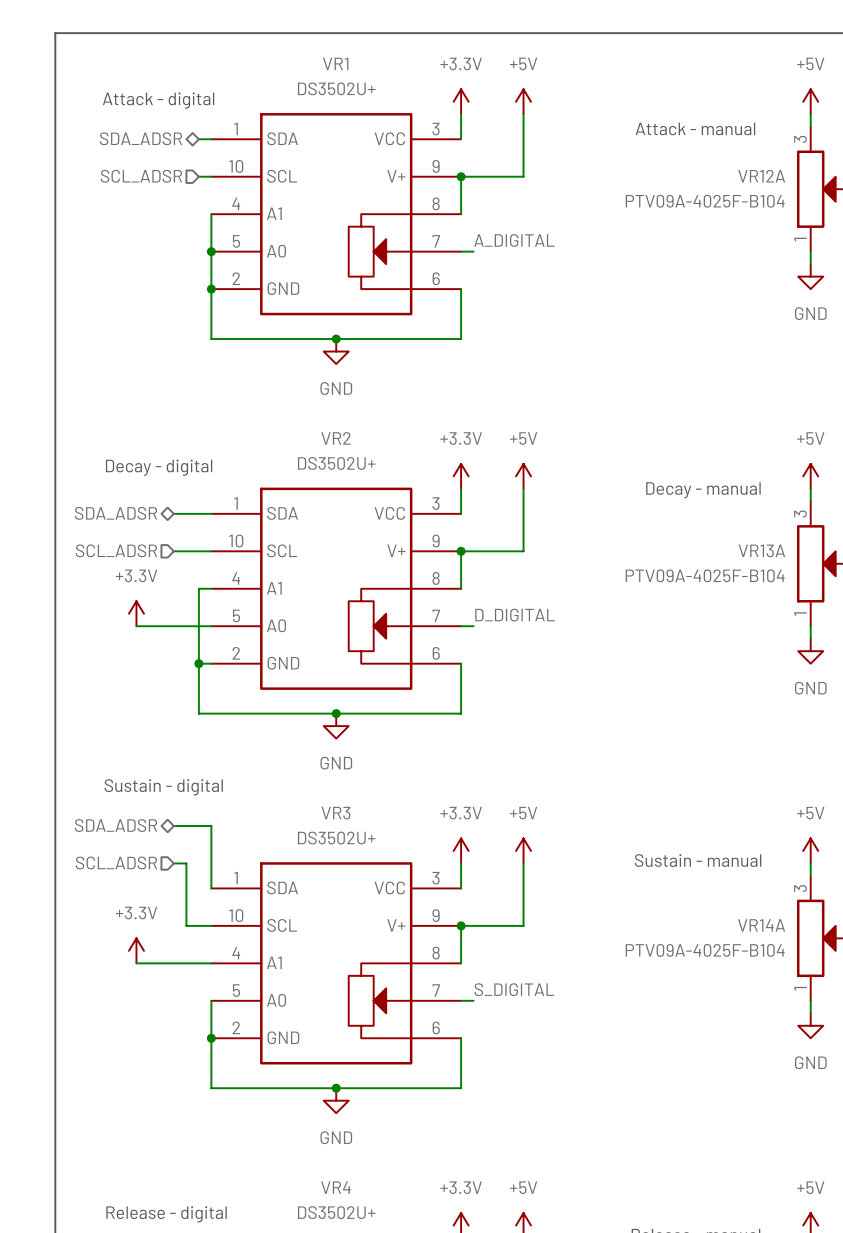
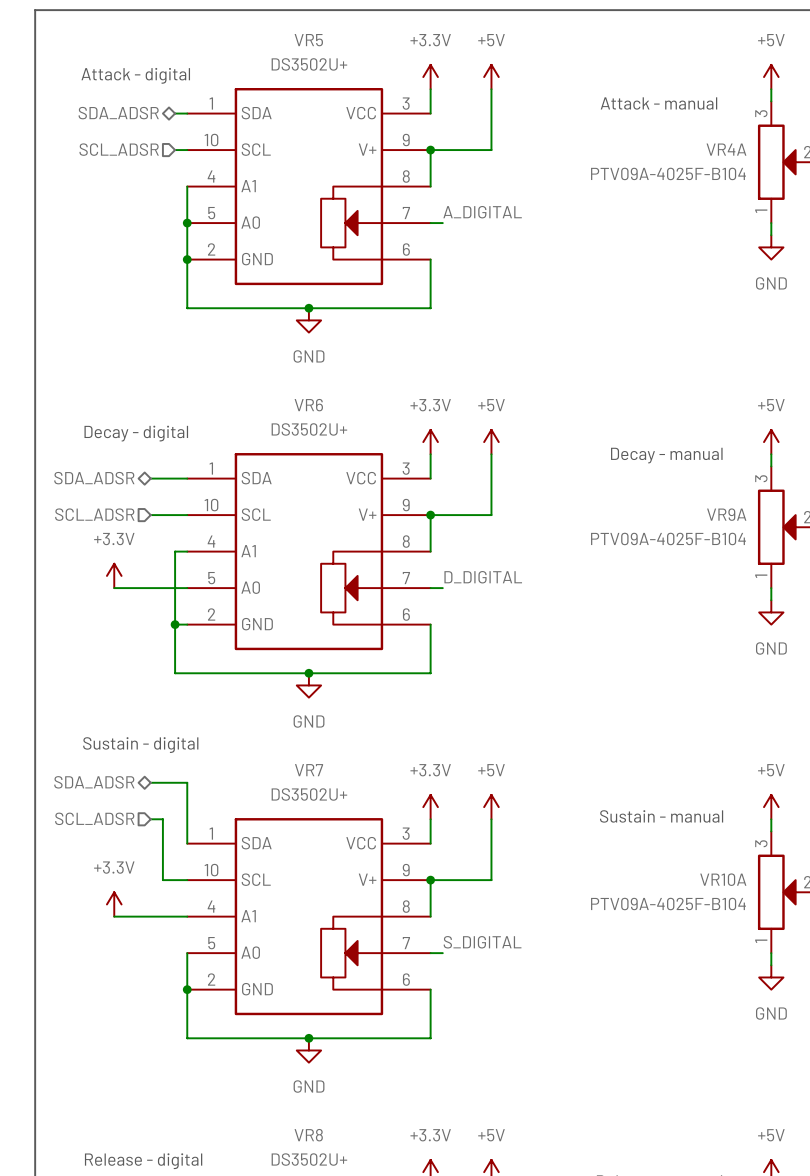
VR1 name: VR1 (335, 63) -> VR5 (308, 40)
VR12A name: VR12A (761, 176) -> VR4A (726, 149)
VR2 name: VR2 (336, 438) -> VR6 (308, 405)
VR13A name: VR13A (761, 550) -> VR9A (726, 514)
VR3 name: VR3 (335, 813) -> VR7 (309, 770)
VR14A name: VR14A (761, 925) -> VR10A (723, 879)
VR4 name: VR4 (336, 1187) -> VR8 (308, 1135)

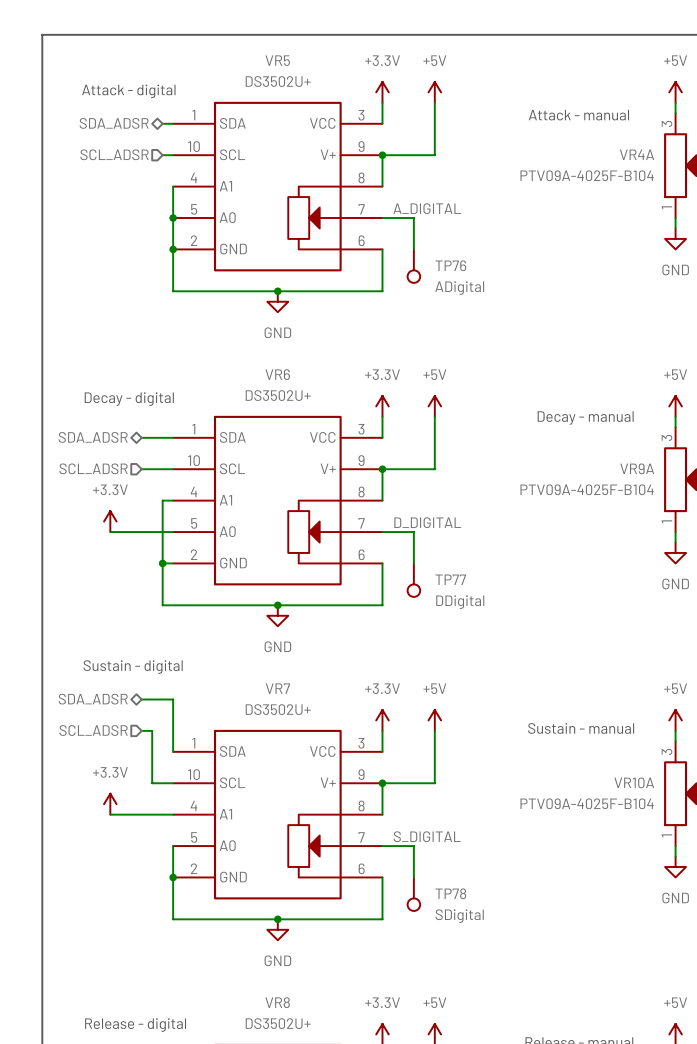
wire: none -> (392, 218) (413, 218) (413, 249)
TP76: none -> ADigital (413, 266)
wire: none -> (392, 532) (413, 532) (413, 563)
TP77: none -> DDigital (413, 580)
wire: none -> (392, 846) (413, 846) (413, 877)
TP78: none -> SDigital (413, 894)

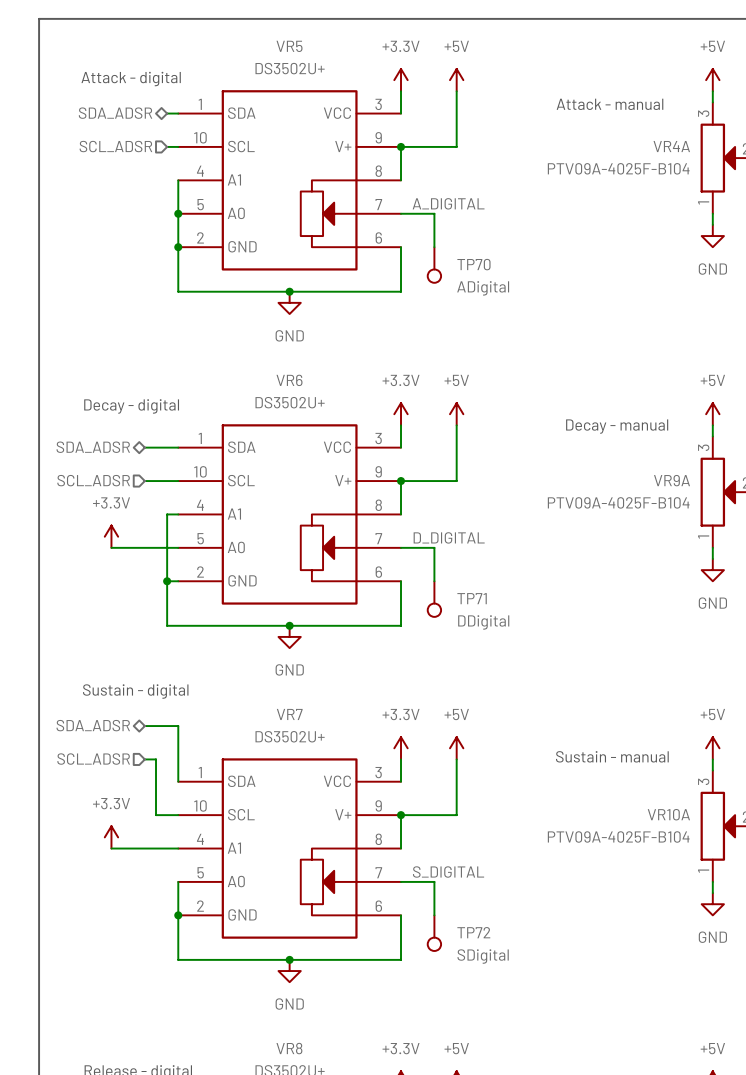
TP76 name: TP76 (450, 265) -> TP70 (473, 264)
TP77 name: TP77 (450, 579) -> TP71 (472, 598)
TP78 name: TP78 (450, 893) -> TP72 (473, 932)

